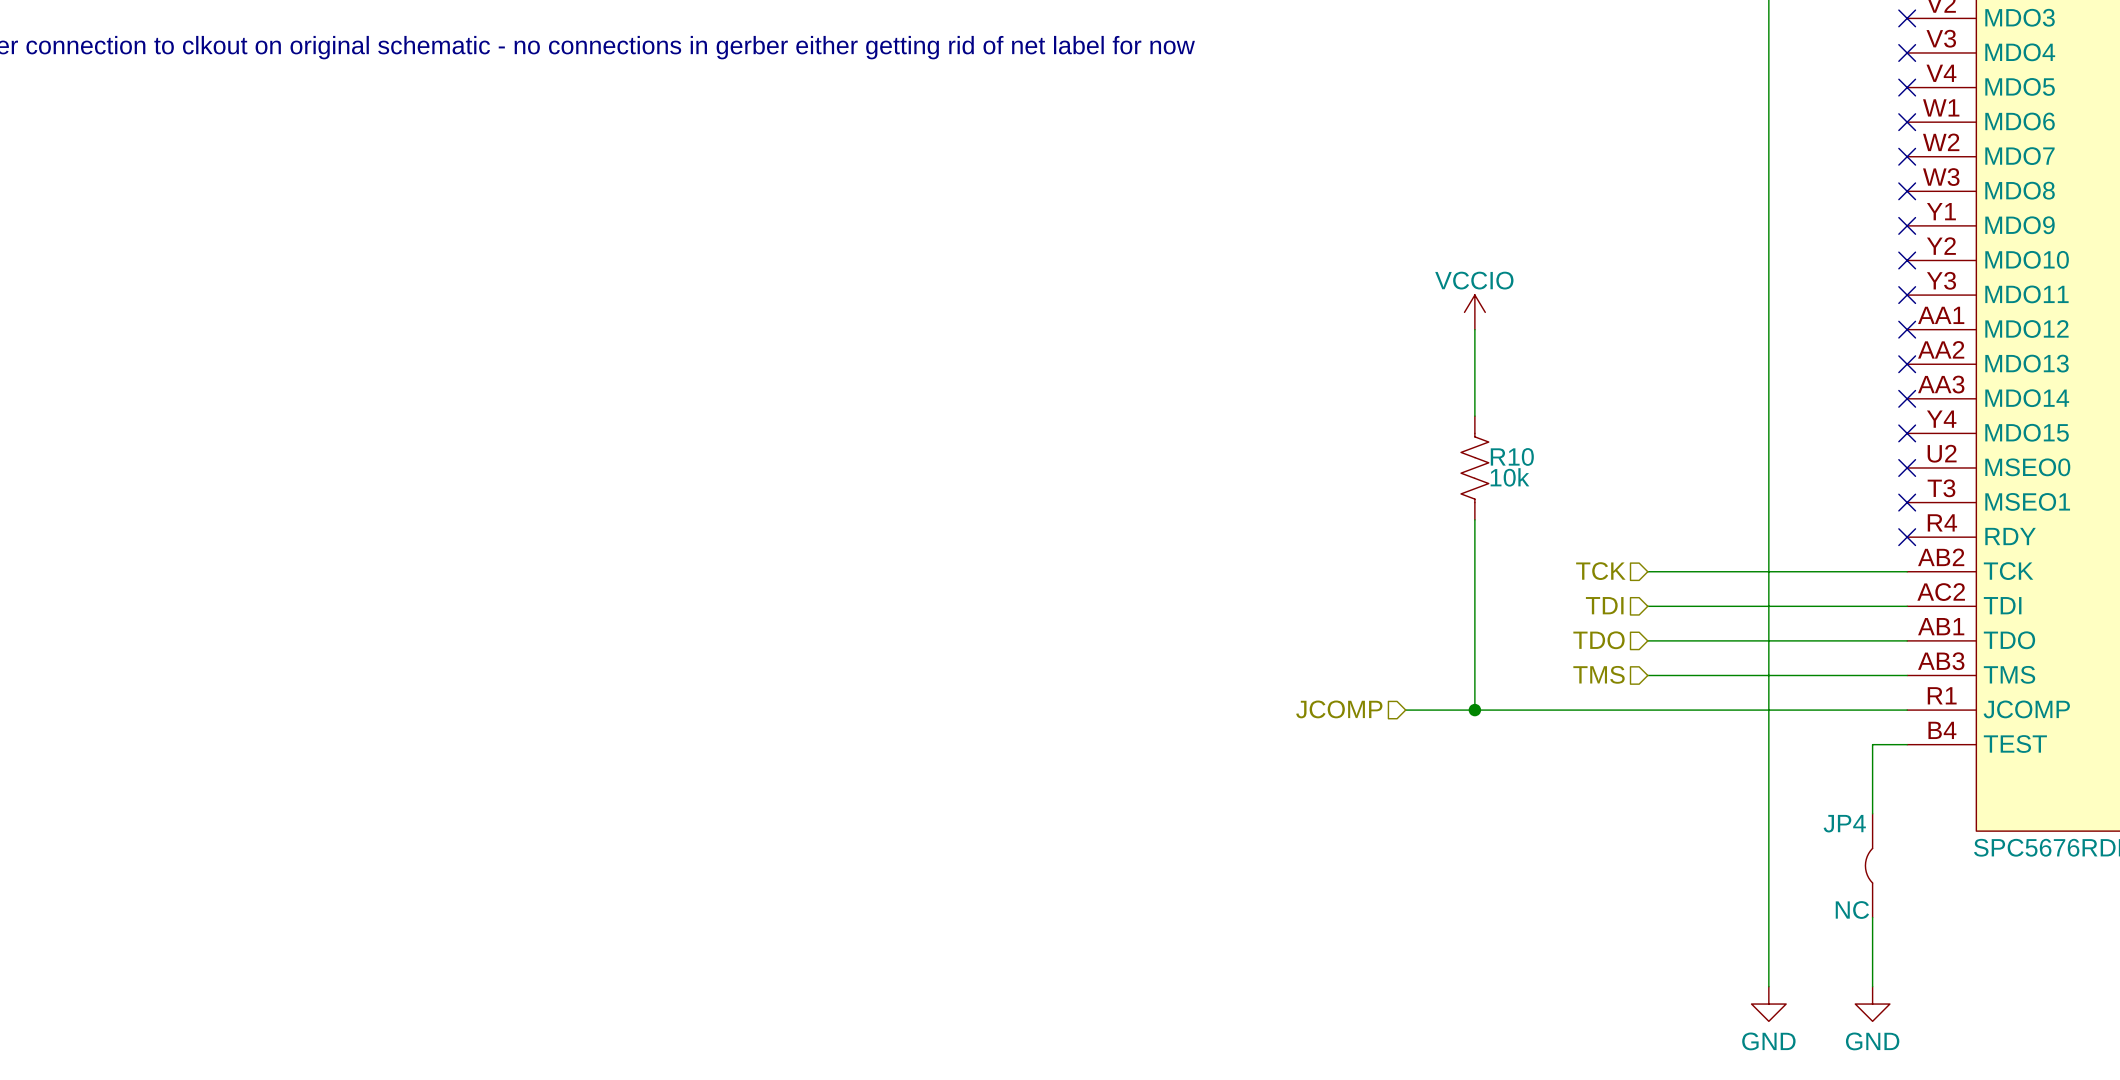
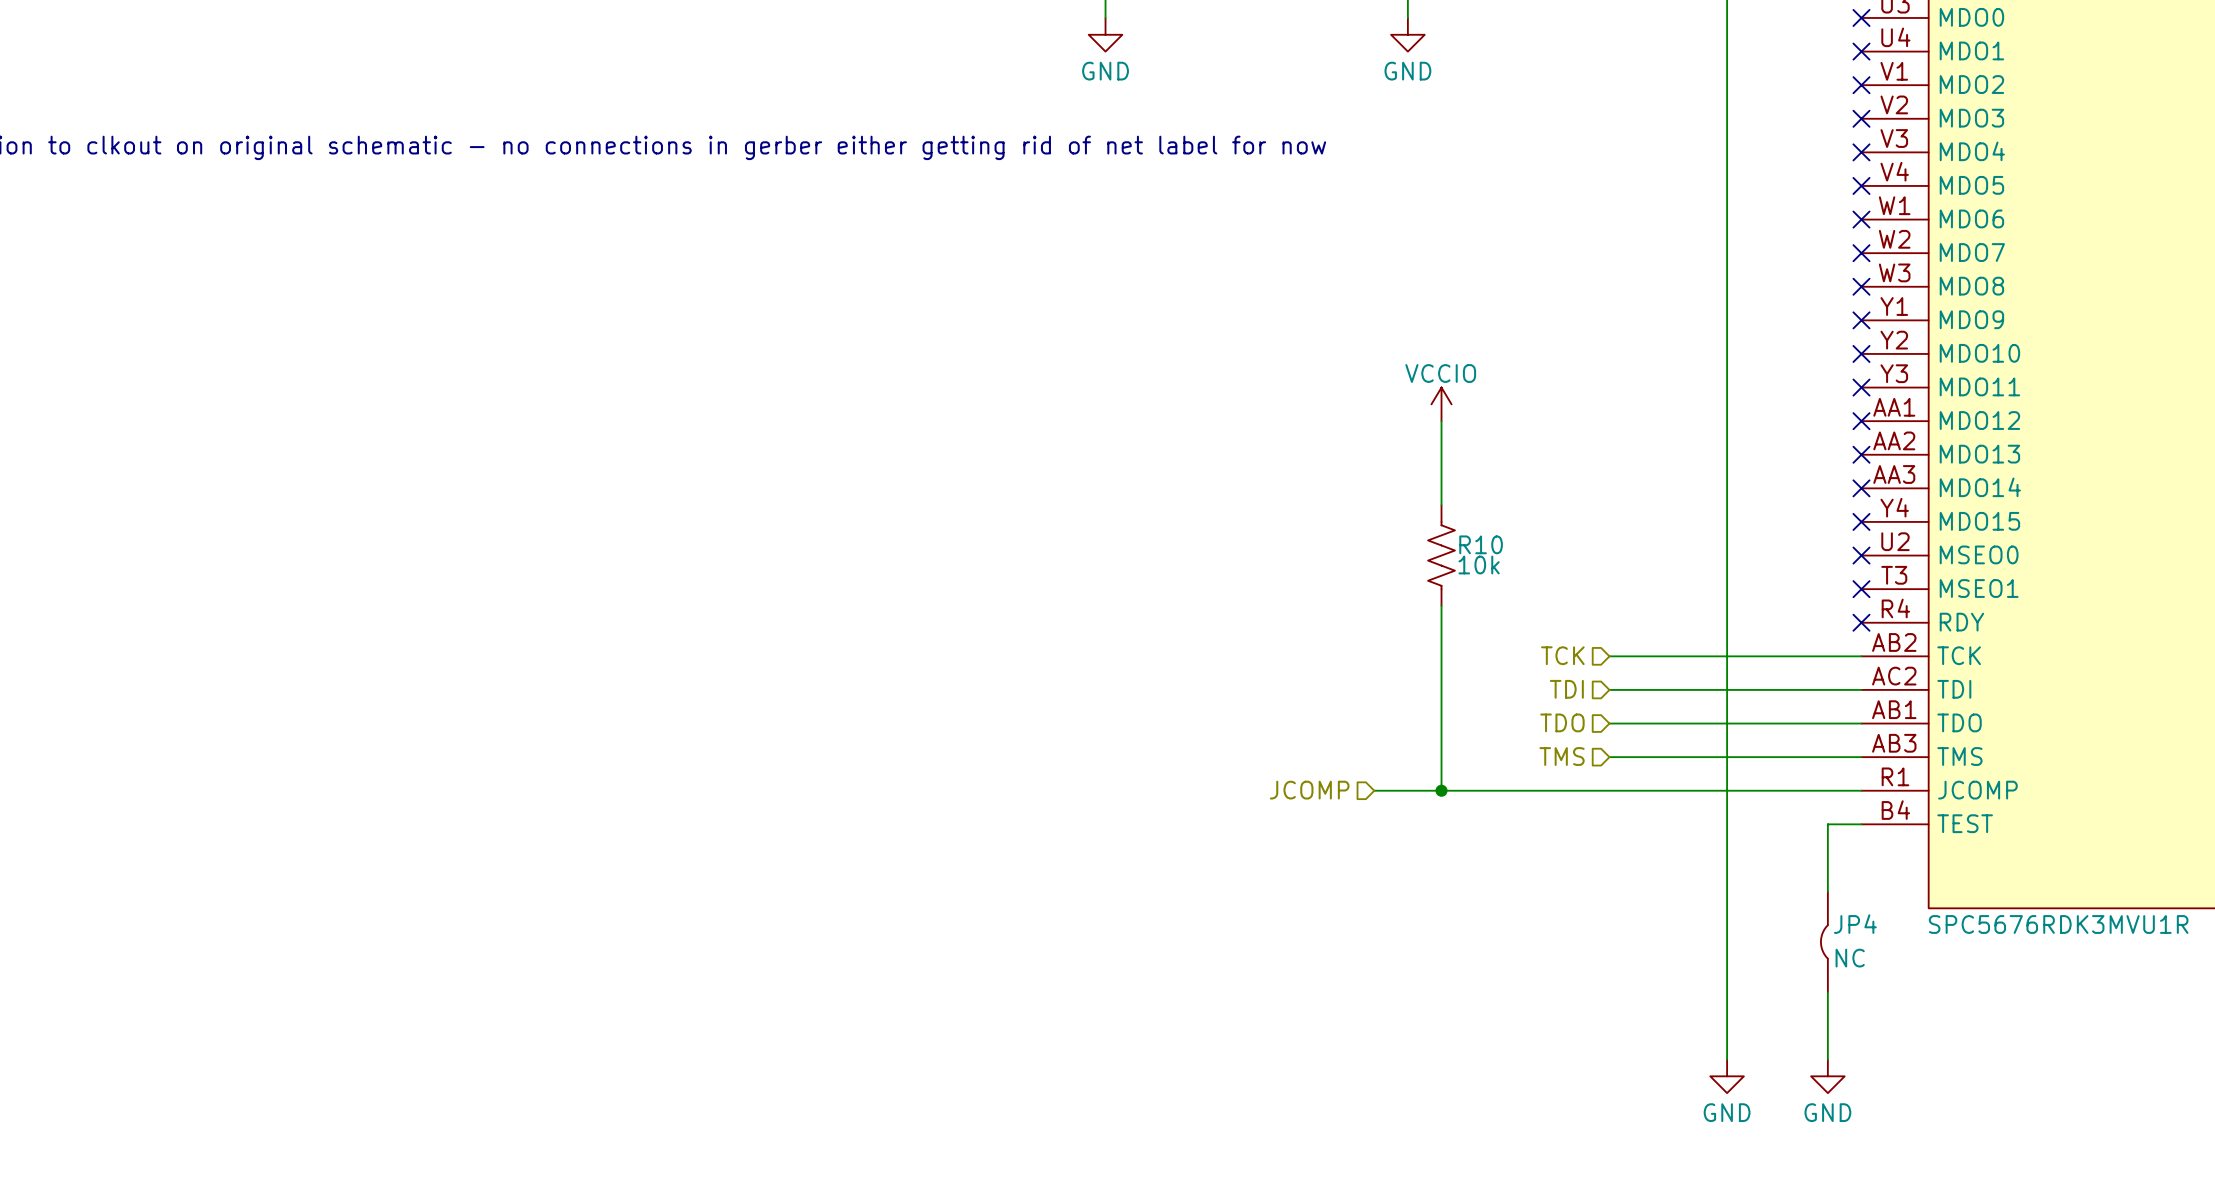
JP4 name position: JP4 (1844, 823) -> JP4 (1855, 924)
JP4 text position: NC (1852, 910) -> NC (1850, 958)

